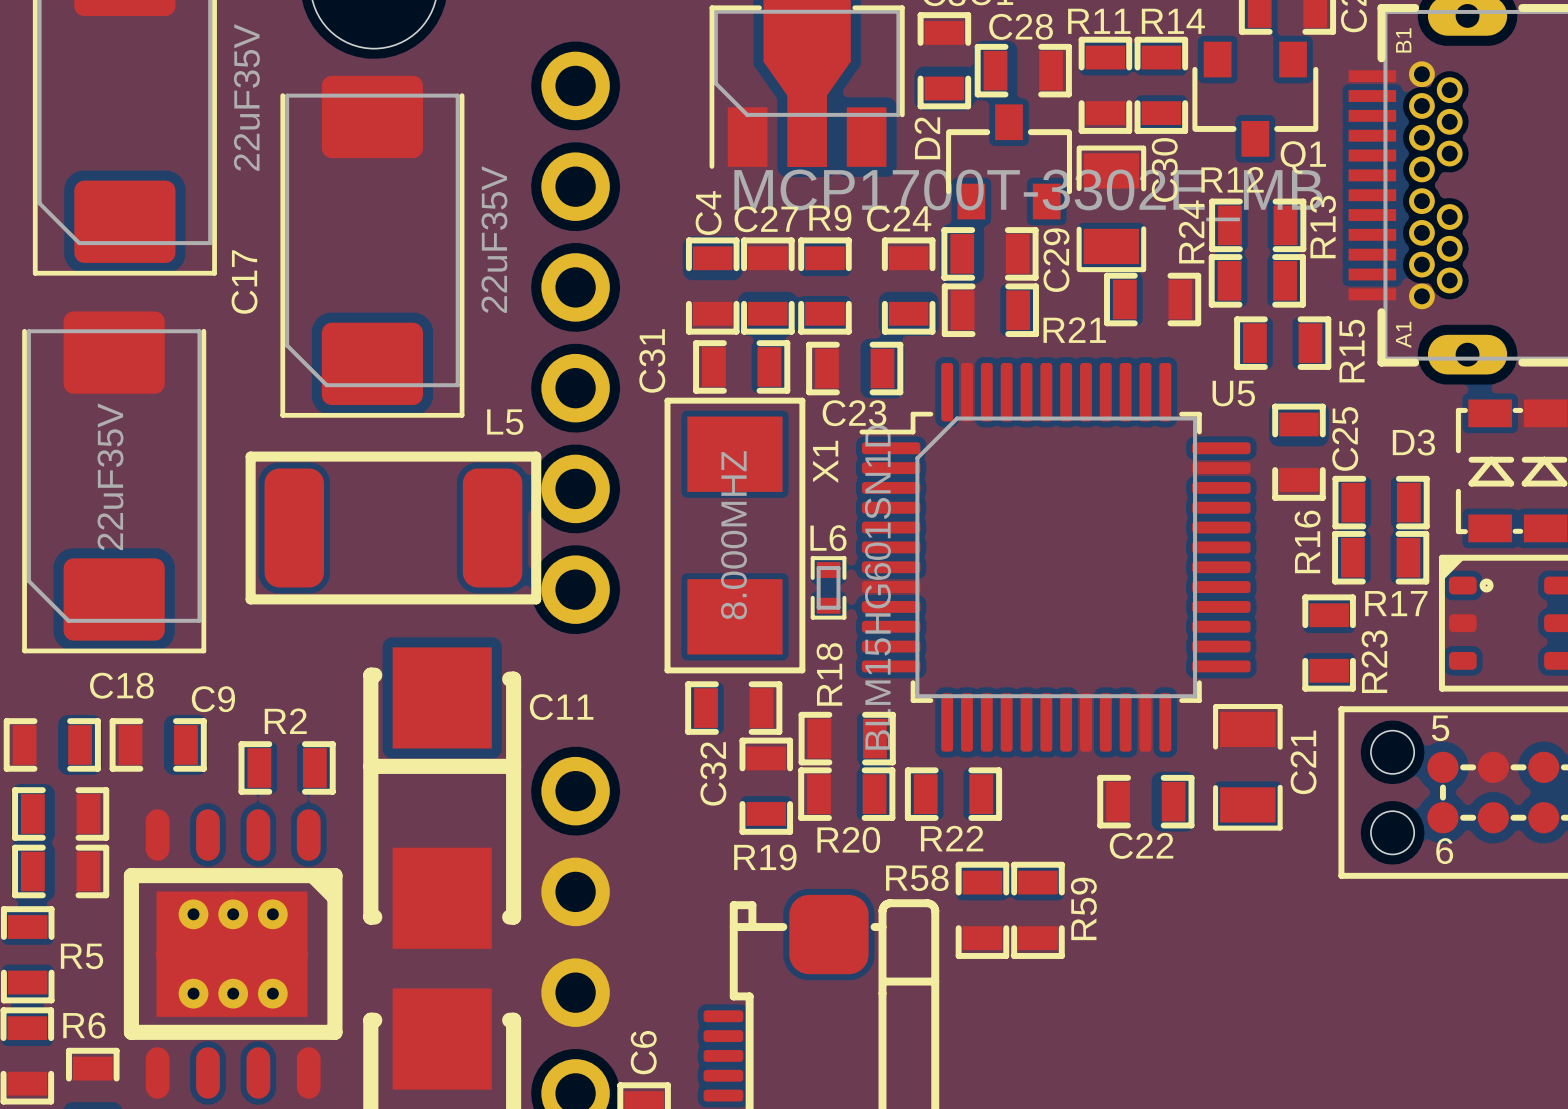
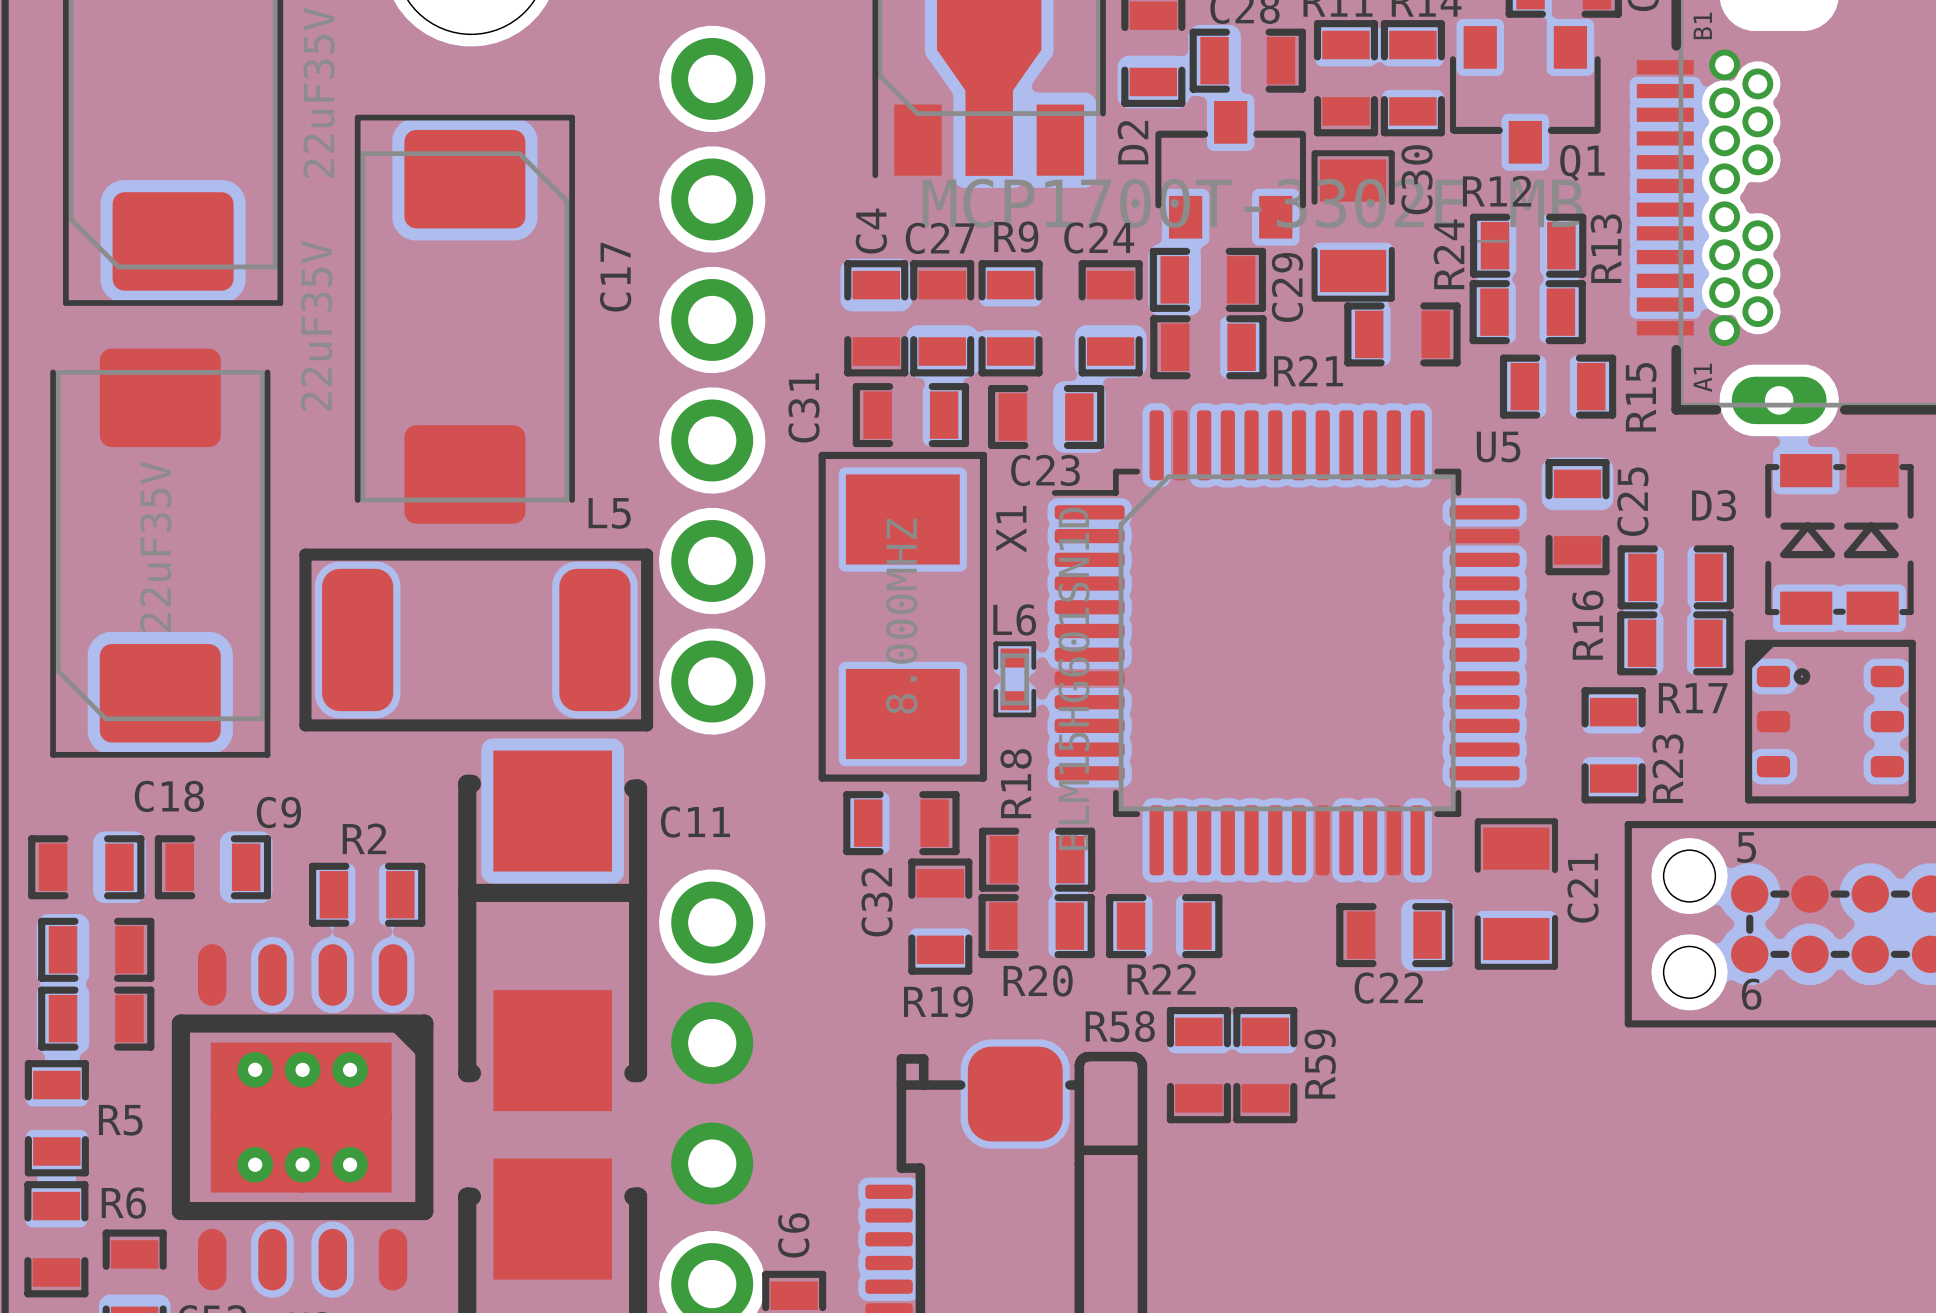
C17 rotation: 0° (372, 246) -> 180° (464, 319)
L5 position: (393, 527) -> (476, 639)

